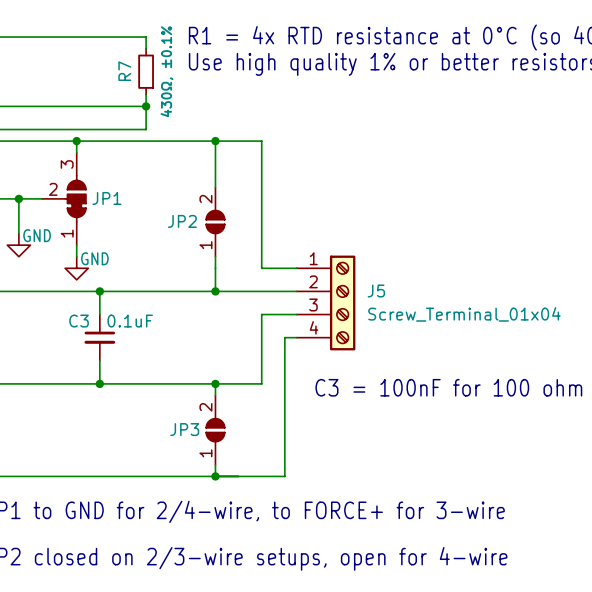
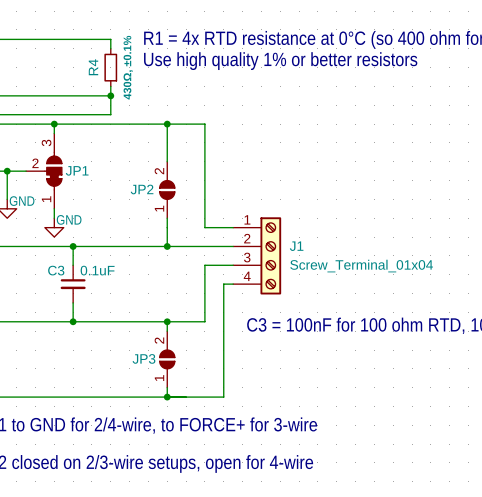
R7 name: R7 (124, 71) -> R4 (93, 67)
J5 name: J5 (376, 290) -> J1 (296, 246)

